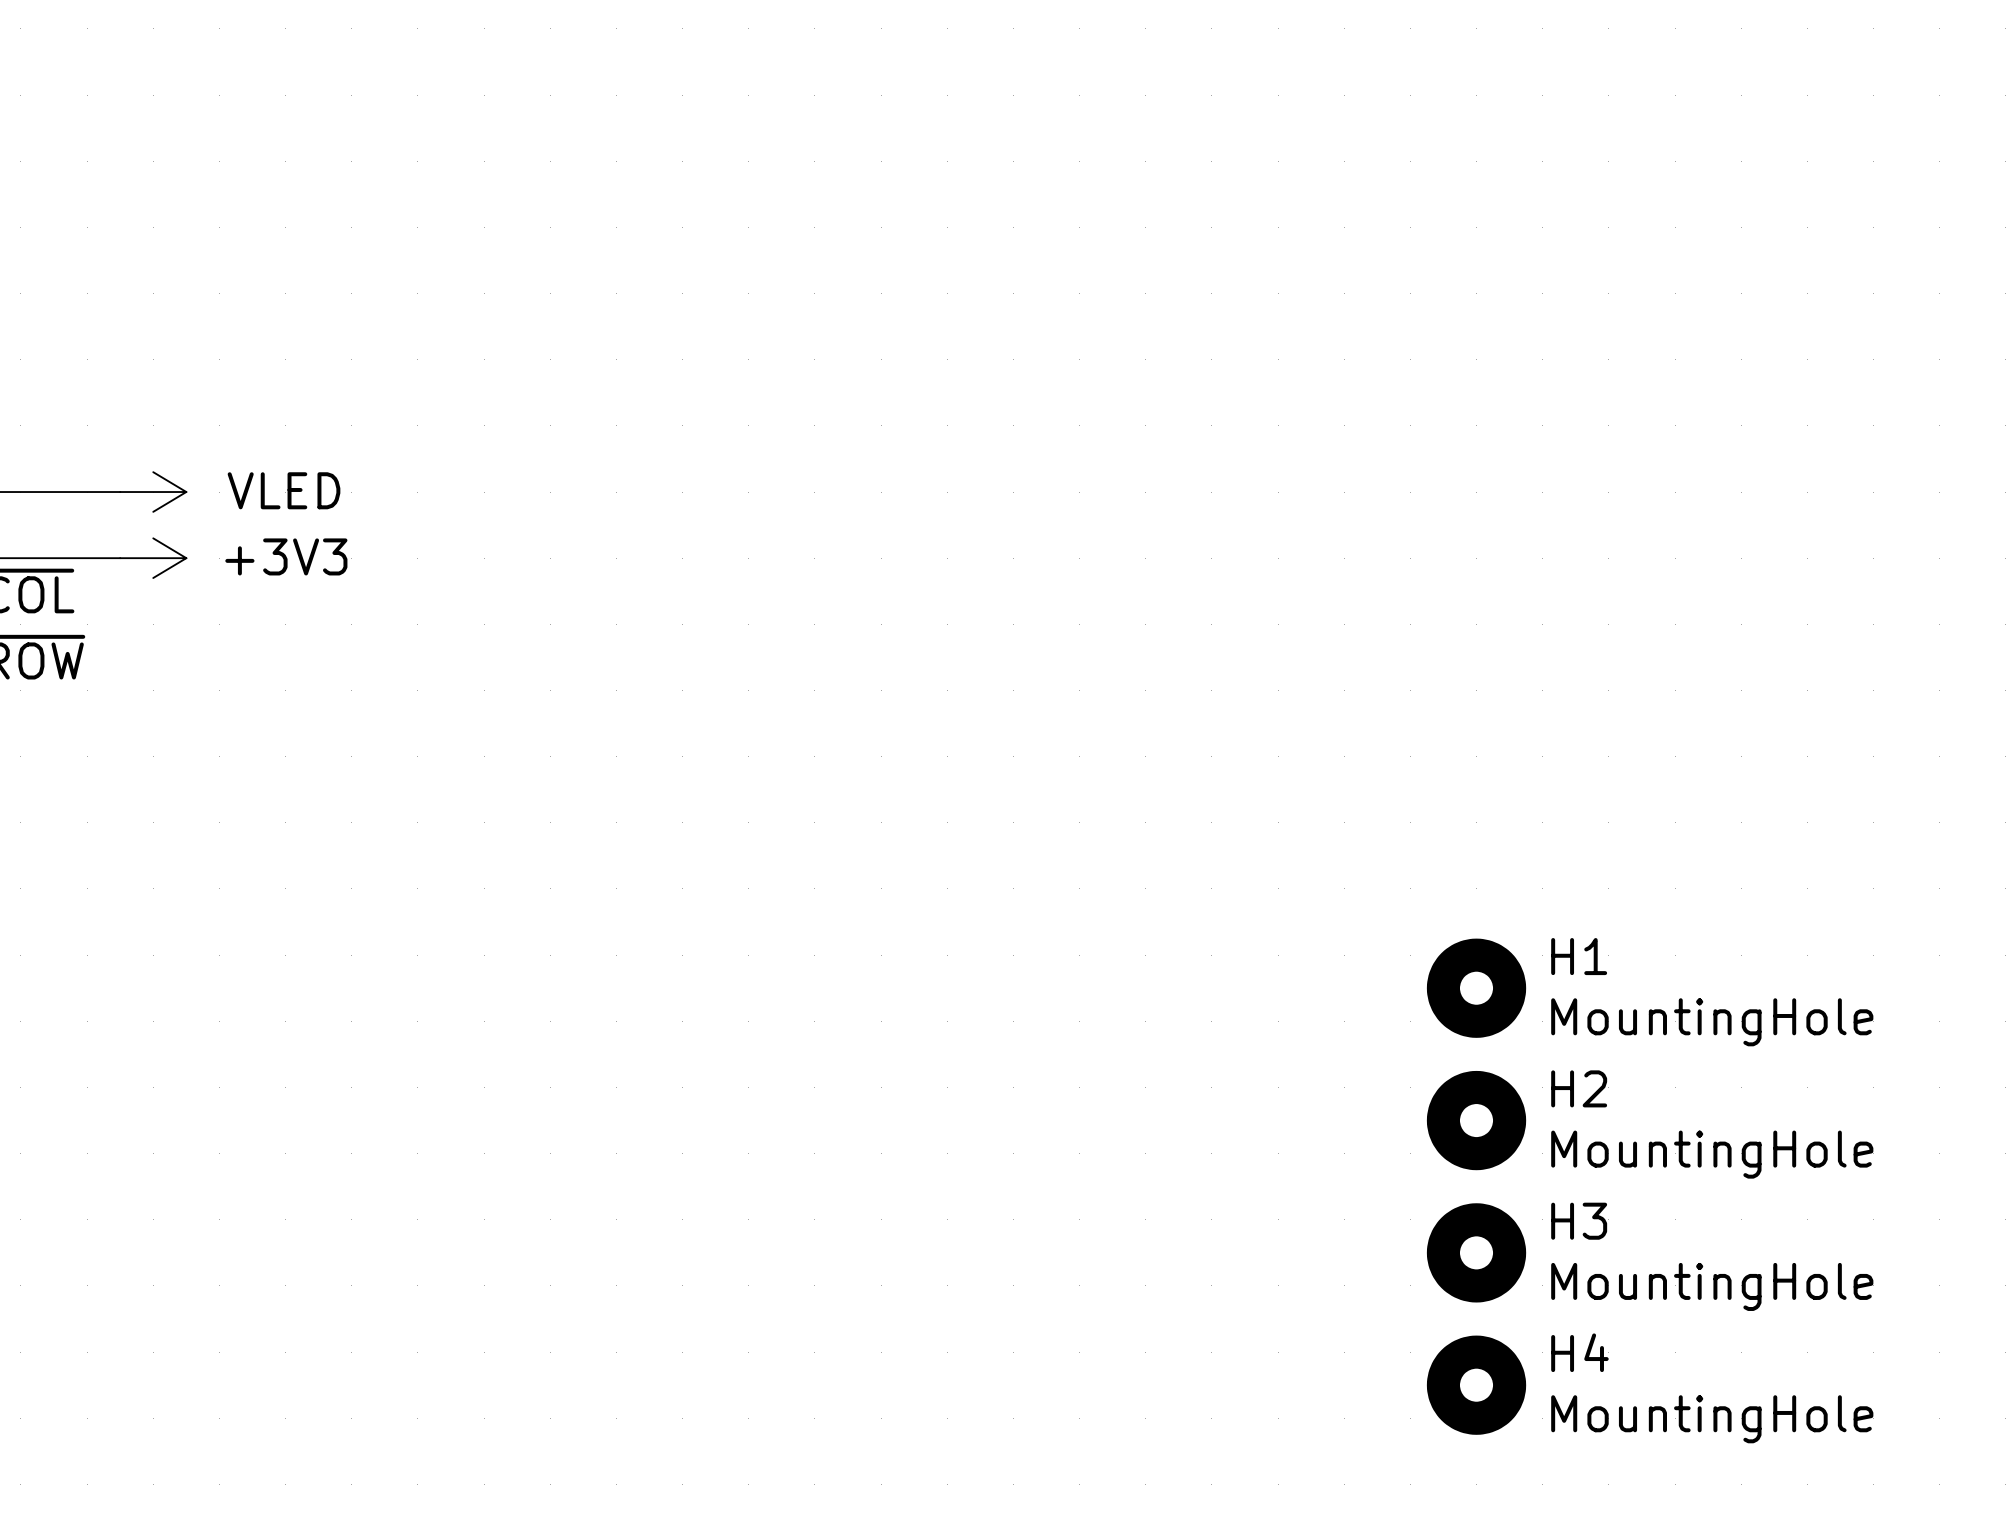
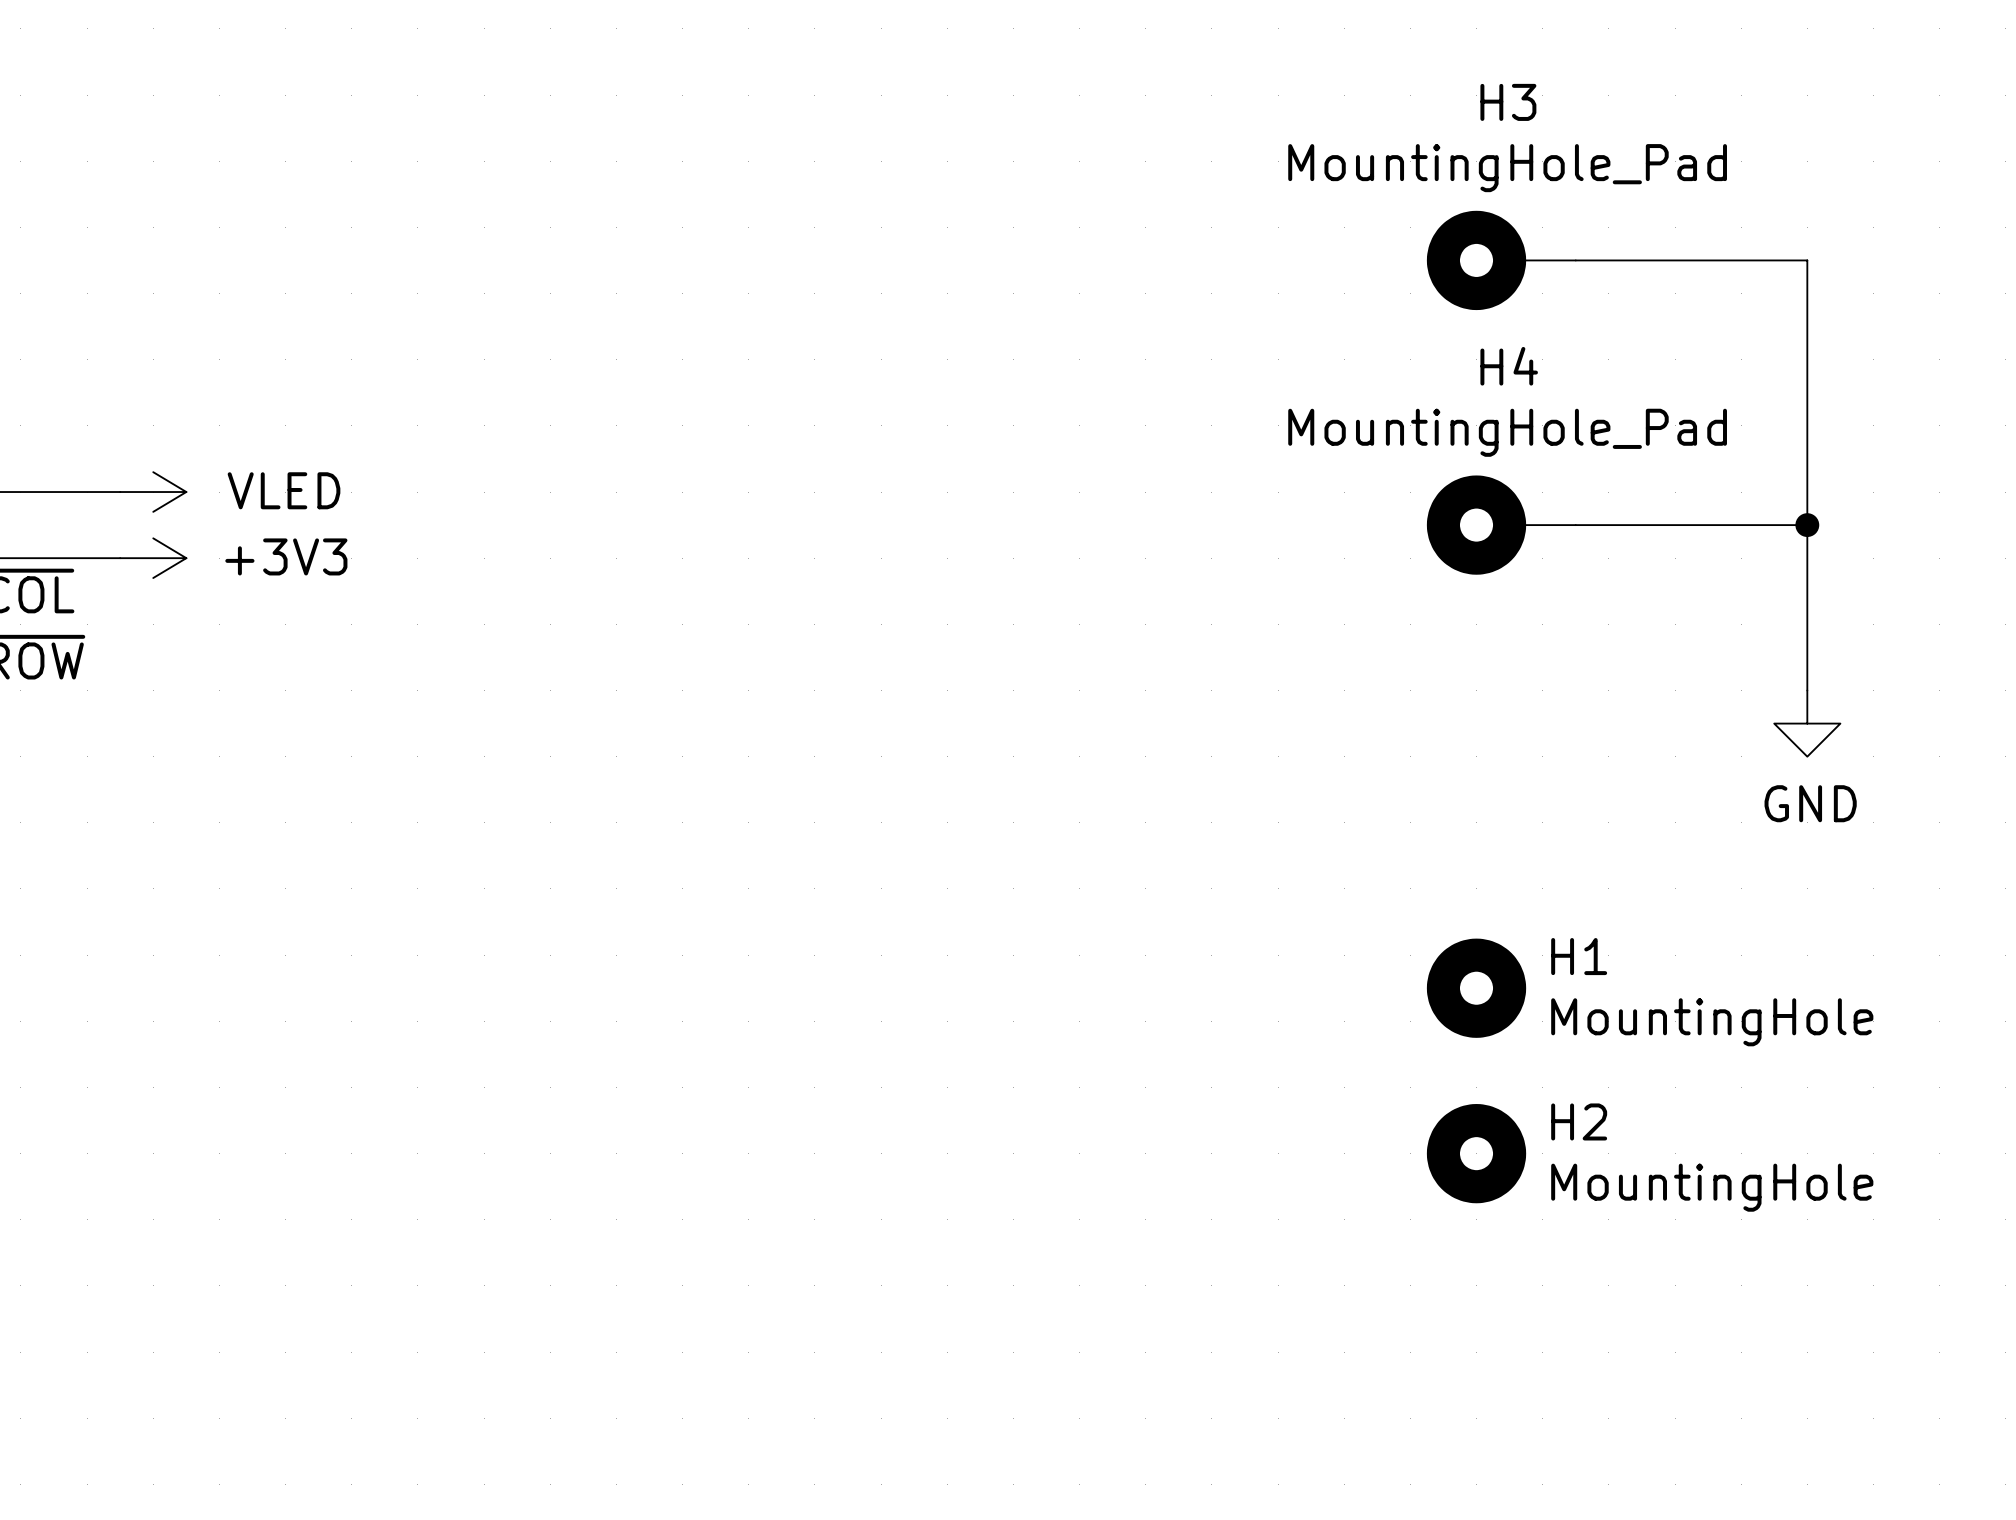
wire: none -> (1575, 260) (1807, 260) (1807, 690)
wire: none -> (1575, 525) (1807, 525)
junction: none -> (1807, 525)
power symbol: none -> GND (1807, 723)
H2 position: (1476, 1120) -> (1476, 1153)
H3 symbol: [1426, 1203, 1527, 1303] -> [1426, 210, 1576, 311]
H3 name position: H3 (1579, 1221) -> H3 (1508, 102)
H3 value: MountingHole (1712, 1286) -> MountingHole_Pad (1507, 168)
H4 symbol: [1426, 1335, 1527, 1435] -> [1426, 475, 1576, 575]
H4 name position: H4 (1579, 1352) -> H4 (1509, 366)
H4 value: MountingHole (1712, 1419) -> MountingHole_Pad (1507, 432)

